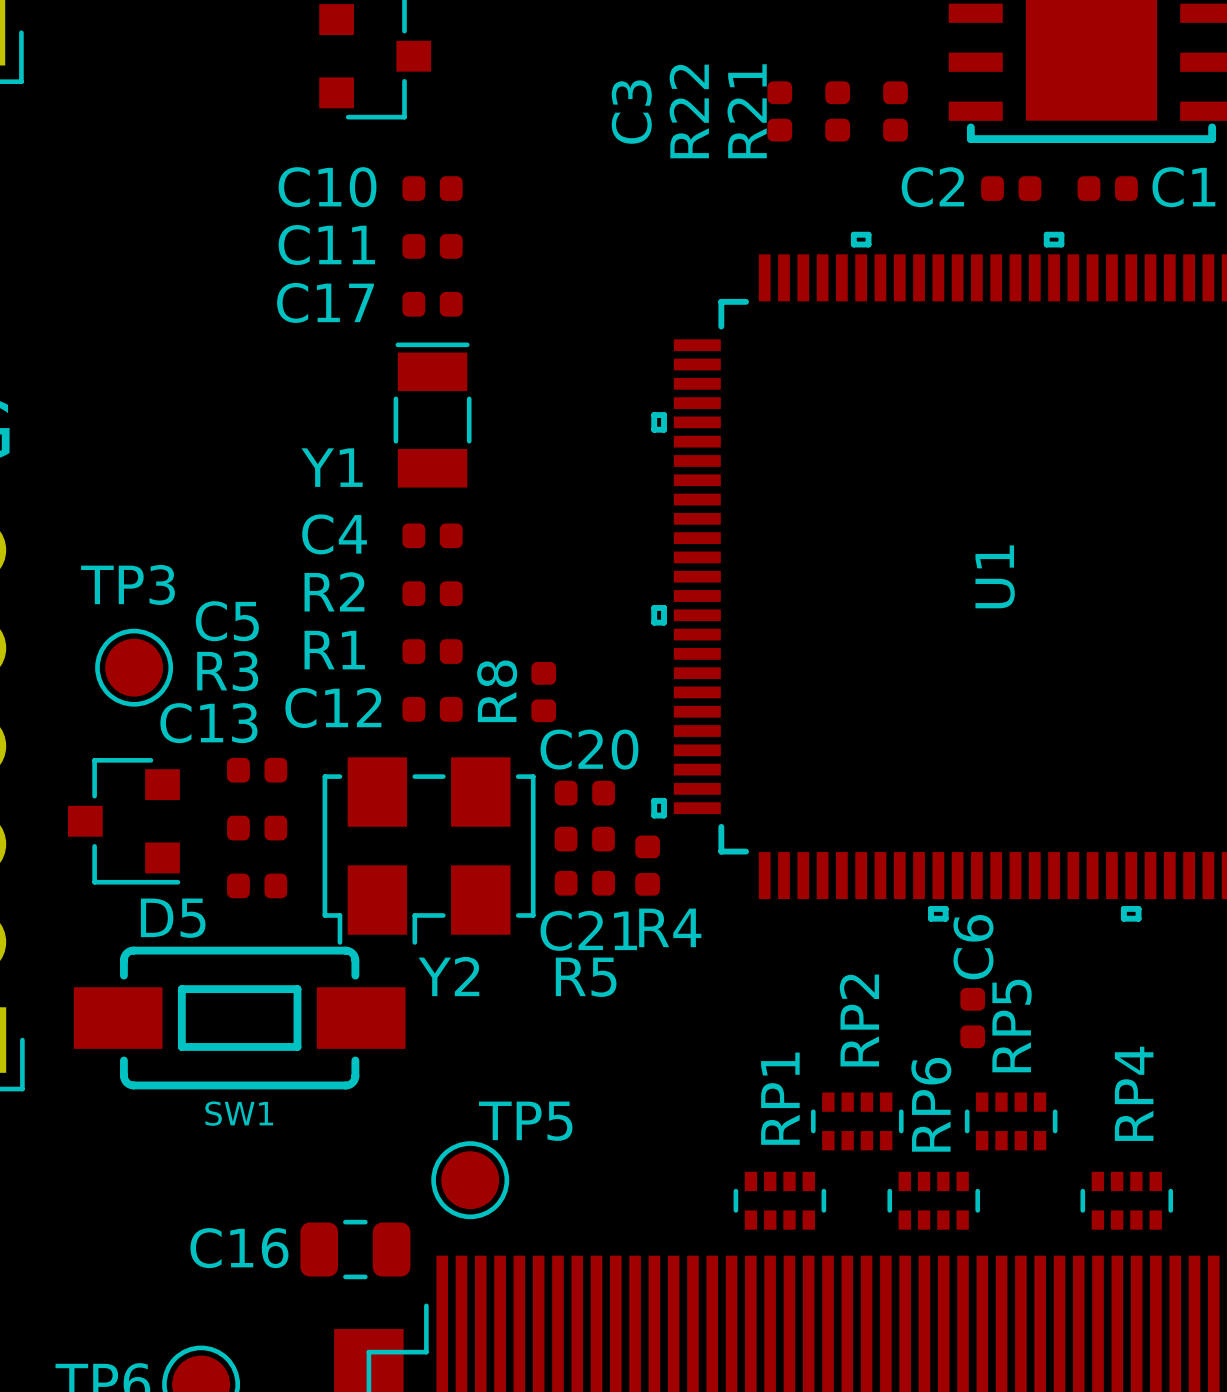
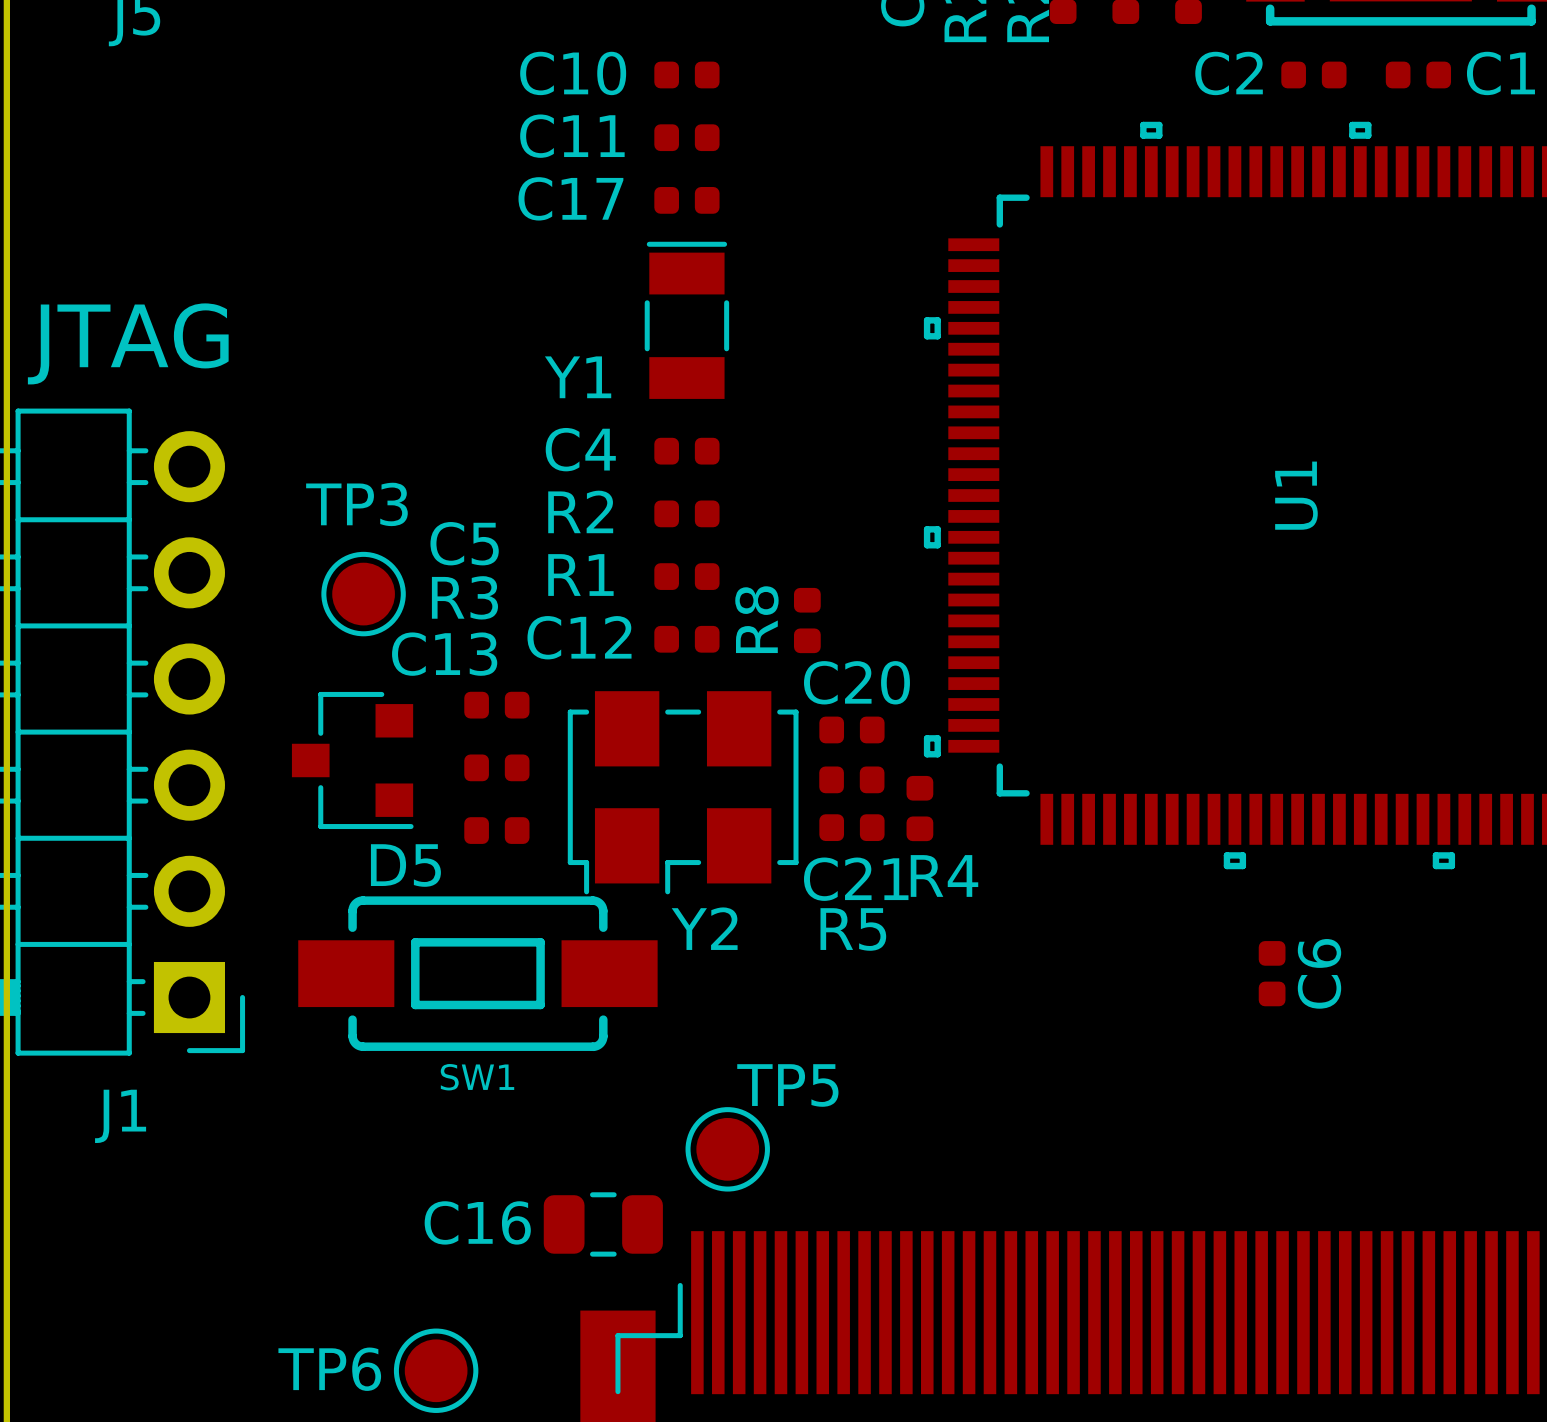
C6 name position: C6 (973, 947) -> C6 (1319, 973)
RP2: (857, 1121) -> none
RP5: (1011, 1121) -> none
RP1: (779, 1200) -> none
RP6: (933, 1200) -> none
RP4: (1126, 1200) -> none

